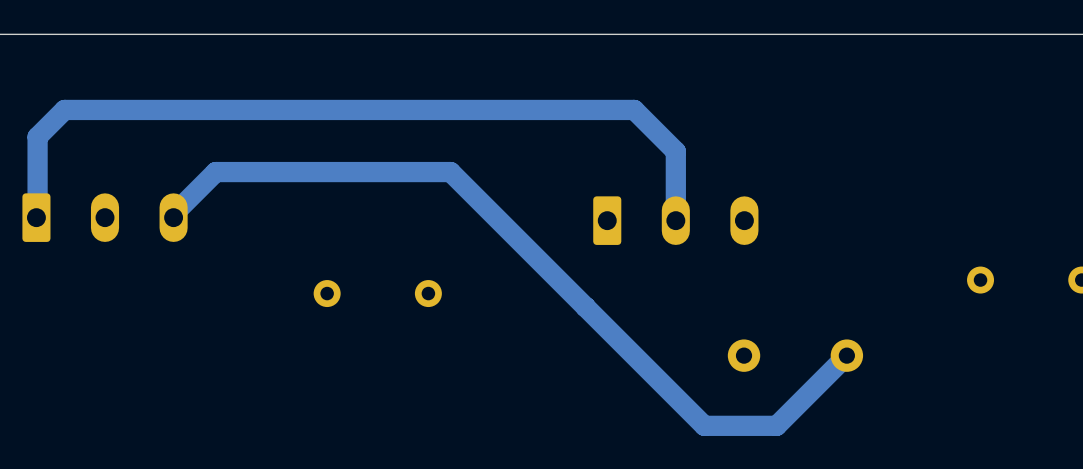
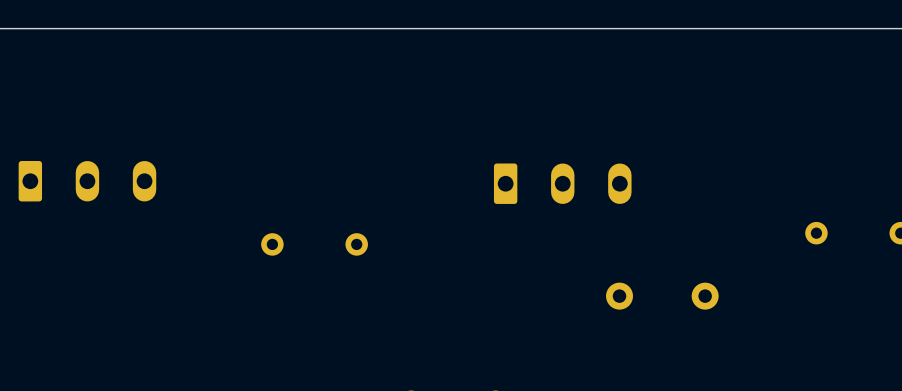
track: (36, 217) (37, 136) (64, 109) (634, 109) (675, 151) (675, 220) -> none
track: (173, 217) (173, 214) (215, 172) (450, 172) (704, 425) (776, 425) (846, 355) -> none

